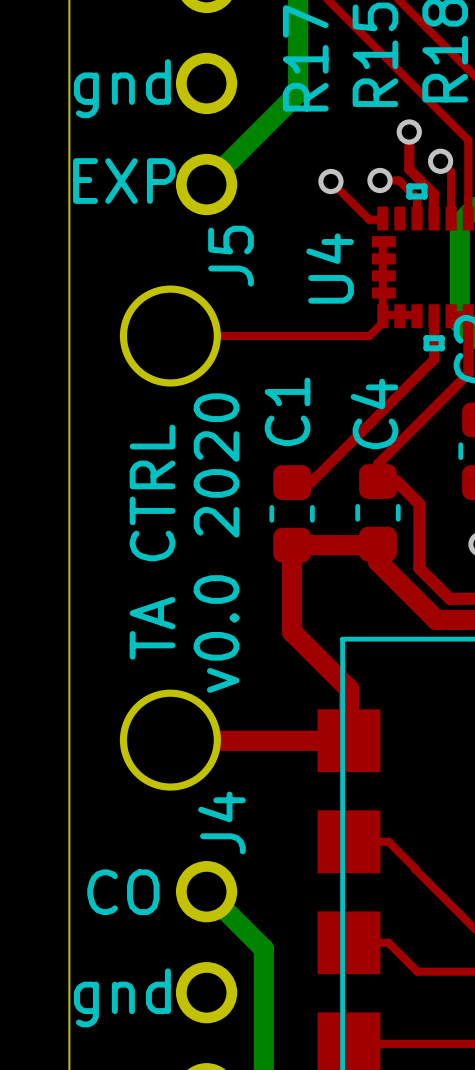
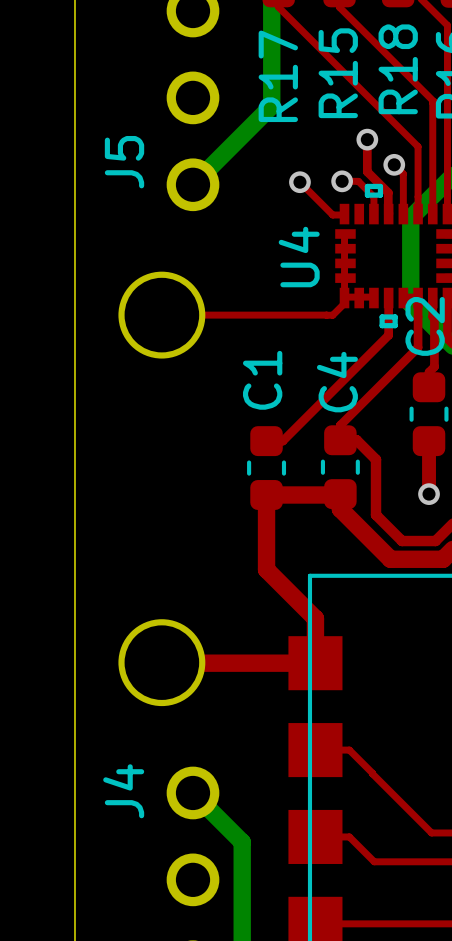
text: gnd (122, 88) -> none
text: EXP (124, 181) -> none
J5 name position: J5 (231, 256) -> J5 (124, 162)
text: TA CTRL (152, 542) -> none
text: v0.0 2020 (216, 543) -> none
J4 name position: J4 (221, 823) -> J4 (123, 791)
text: CO (123, 892) -> none
text: gnd (122, 997) -> none

